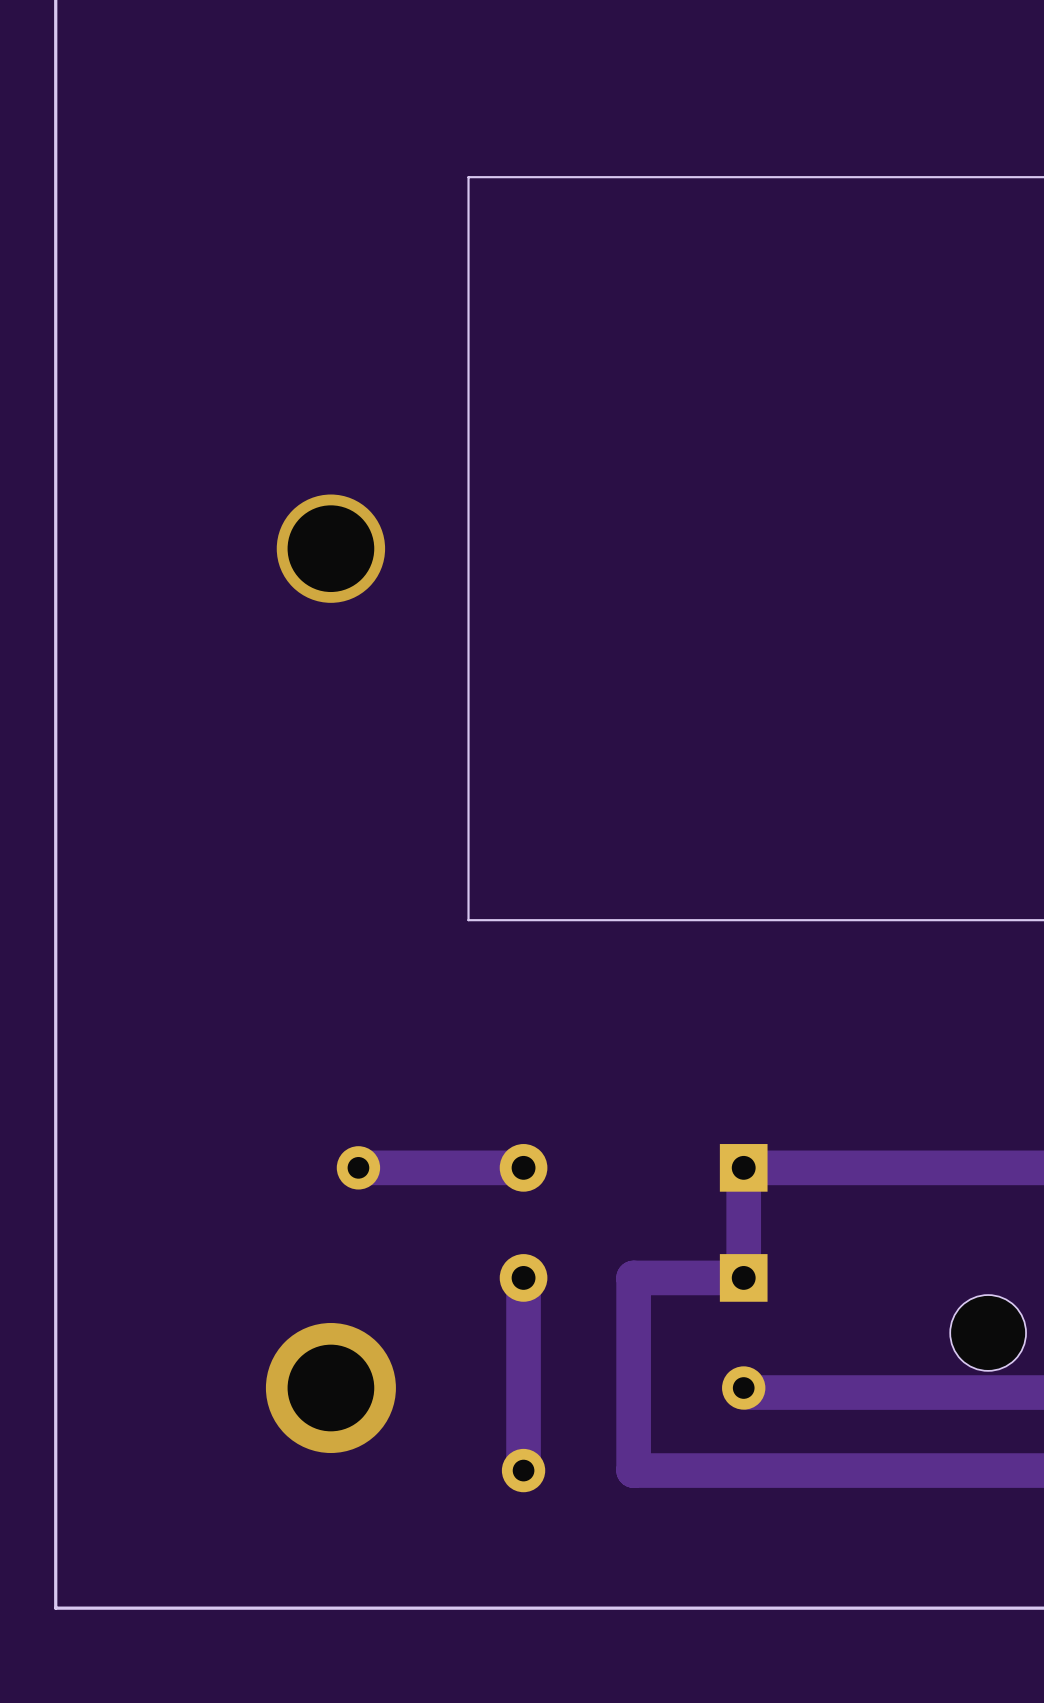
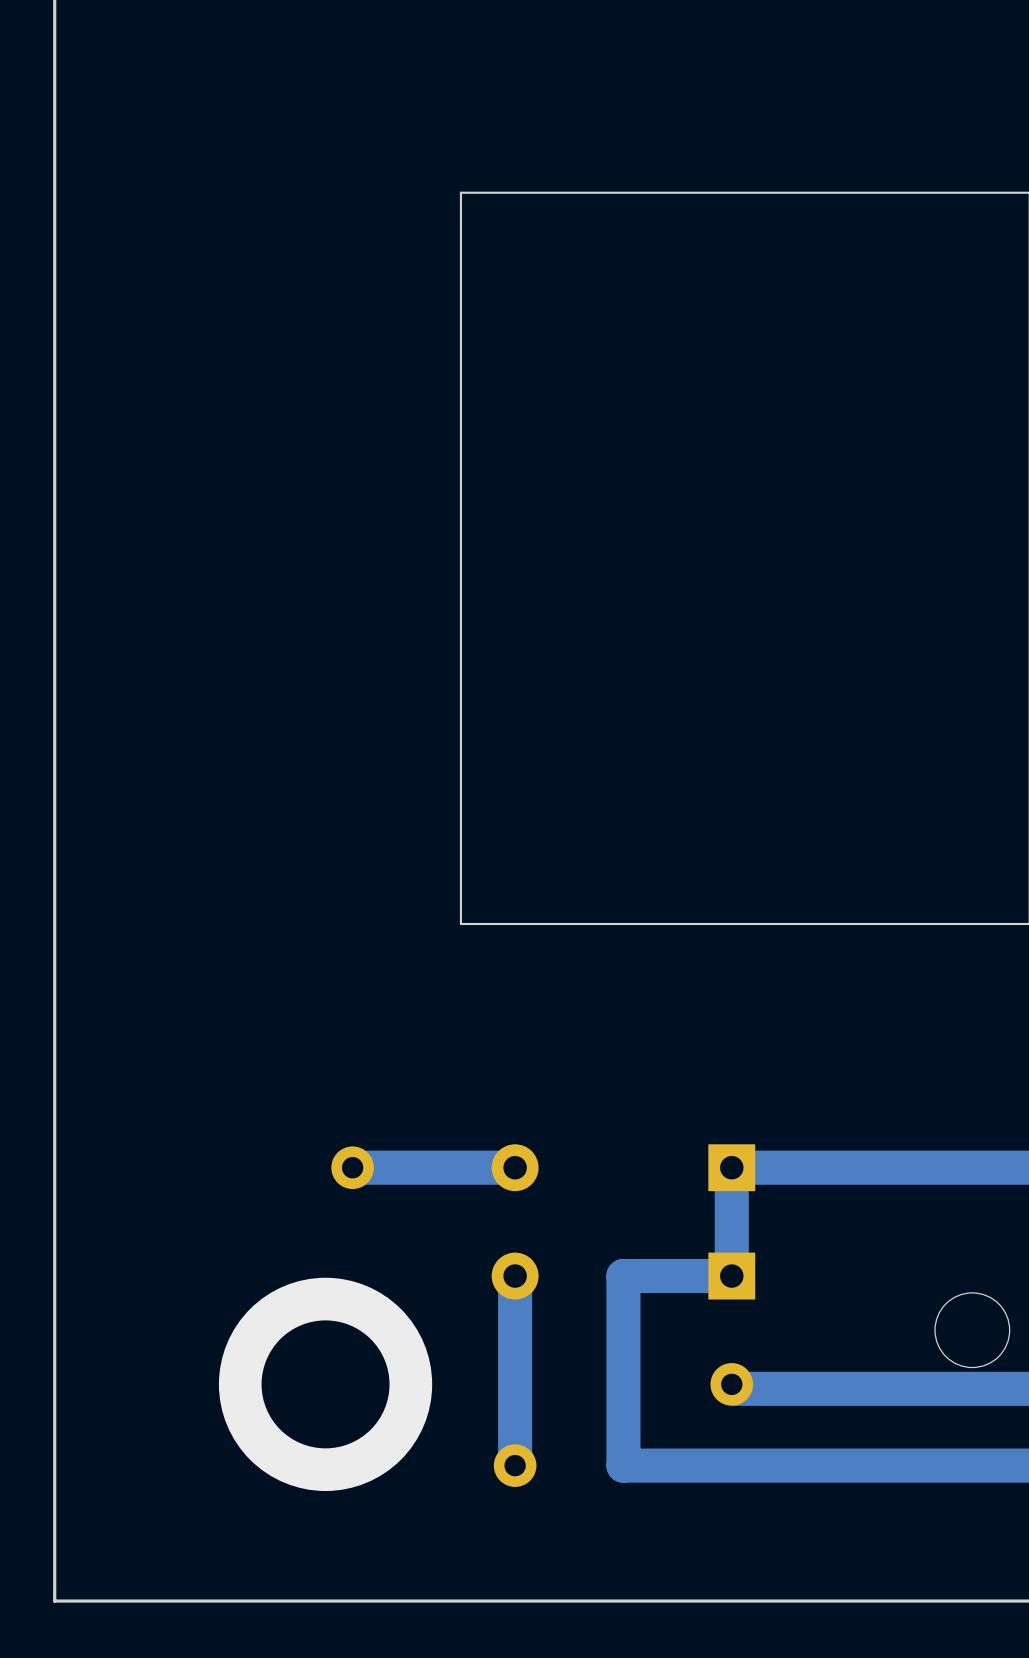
via: (330, 548) -> none
via size: [265, 1322, 396, 1454] -> [218, 1277, 433, 1492]

